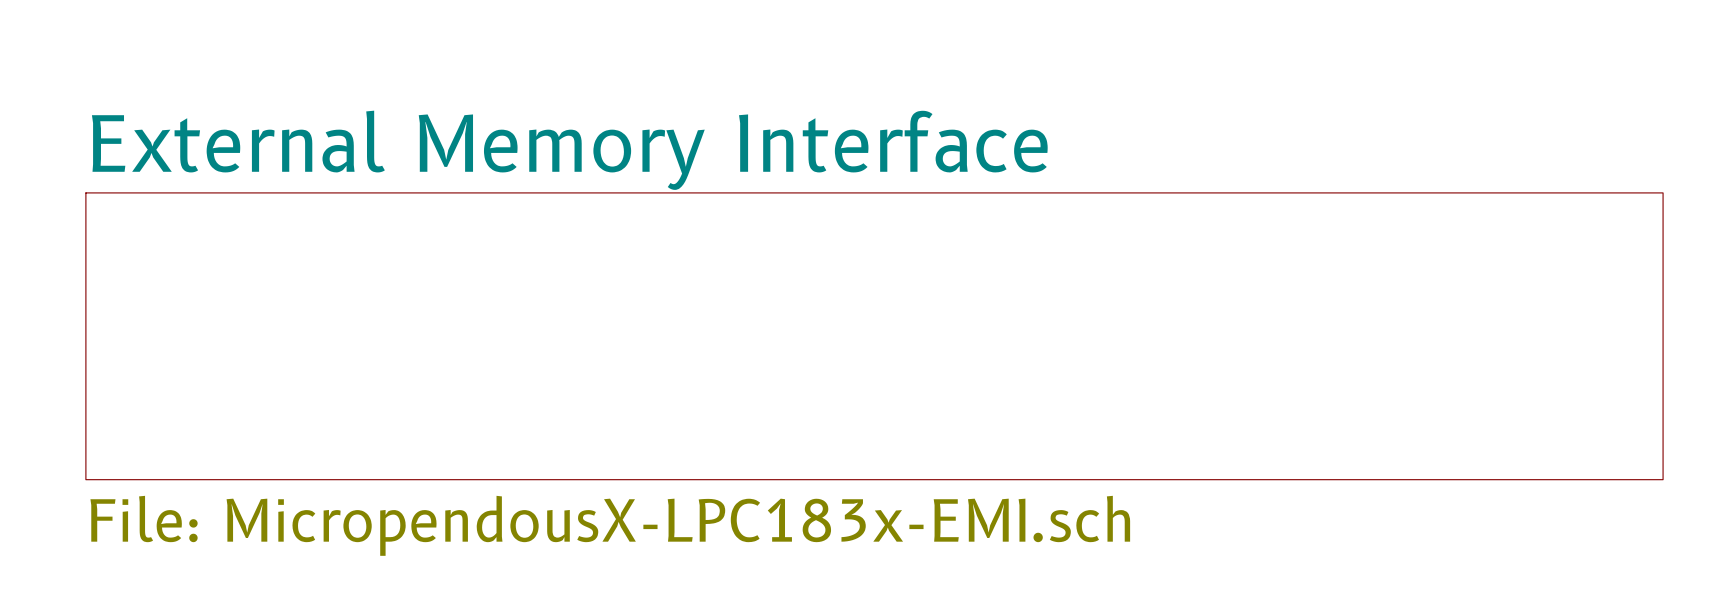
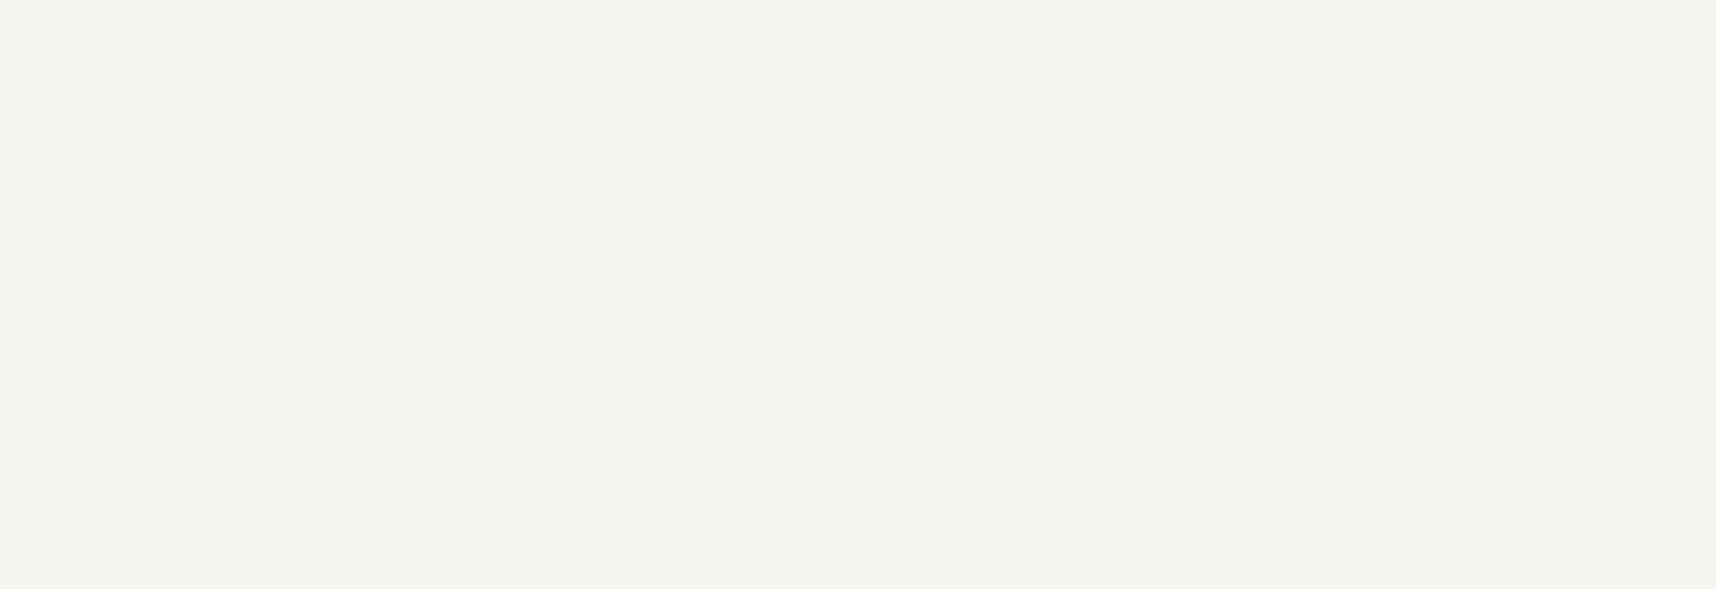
sheet External Memory Interface: File: MicropendousX-LPC183x-EMI.sch (874, 336) -> none

